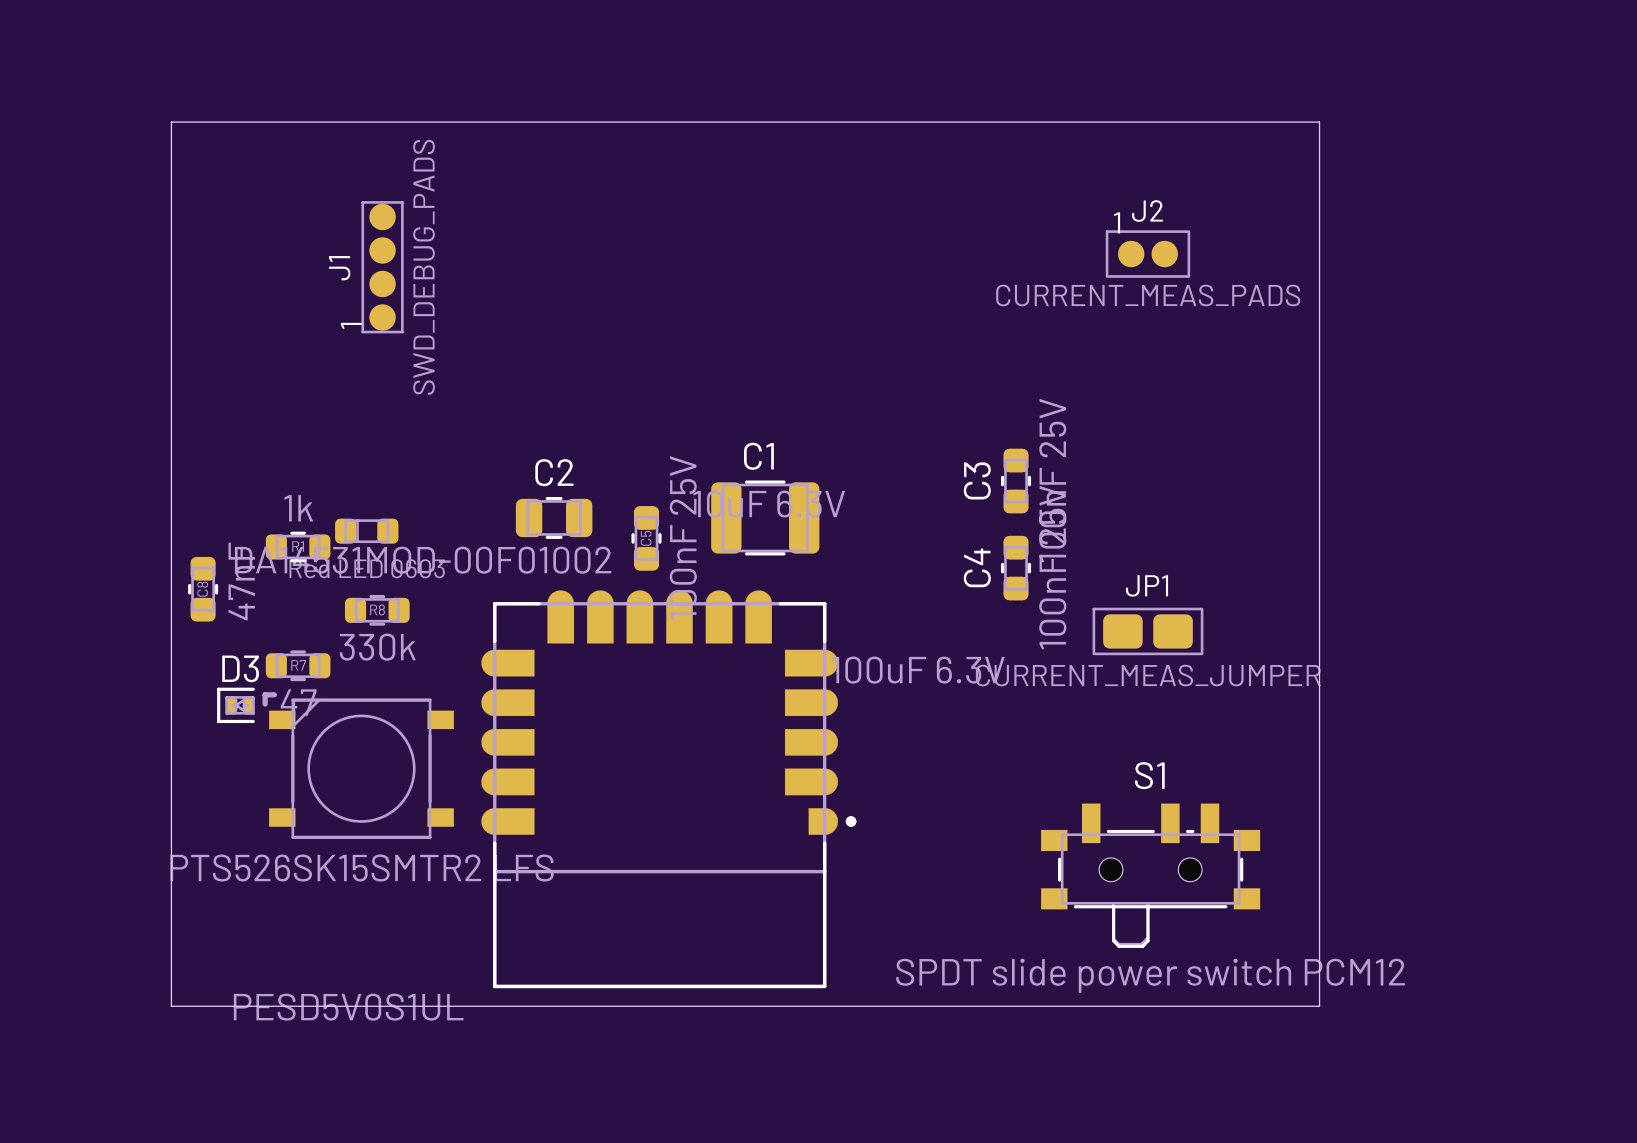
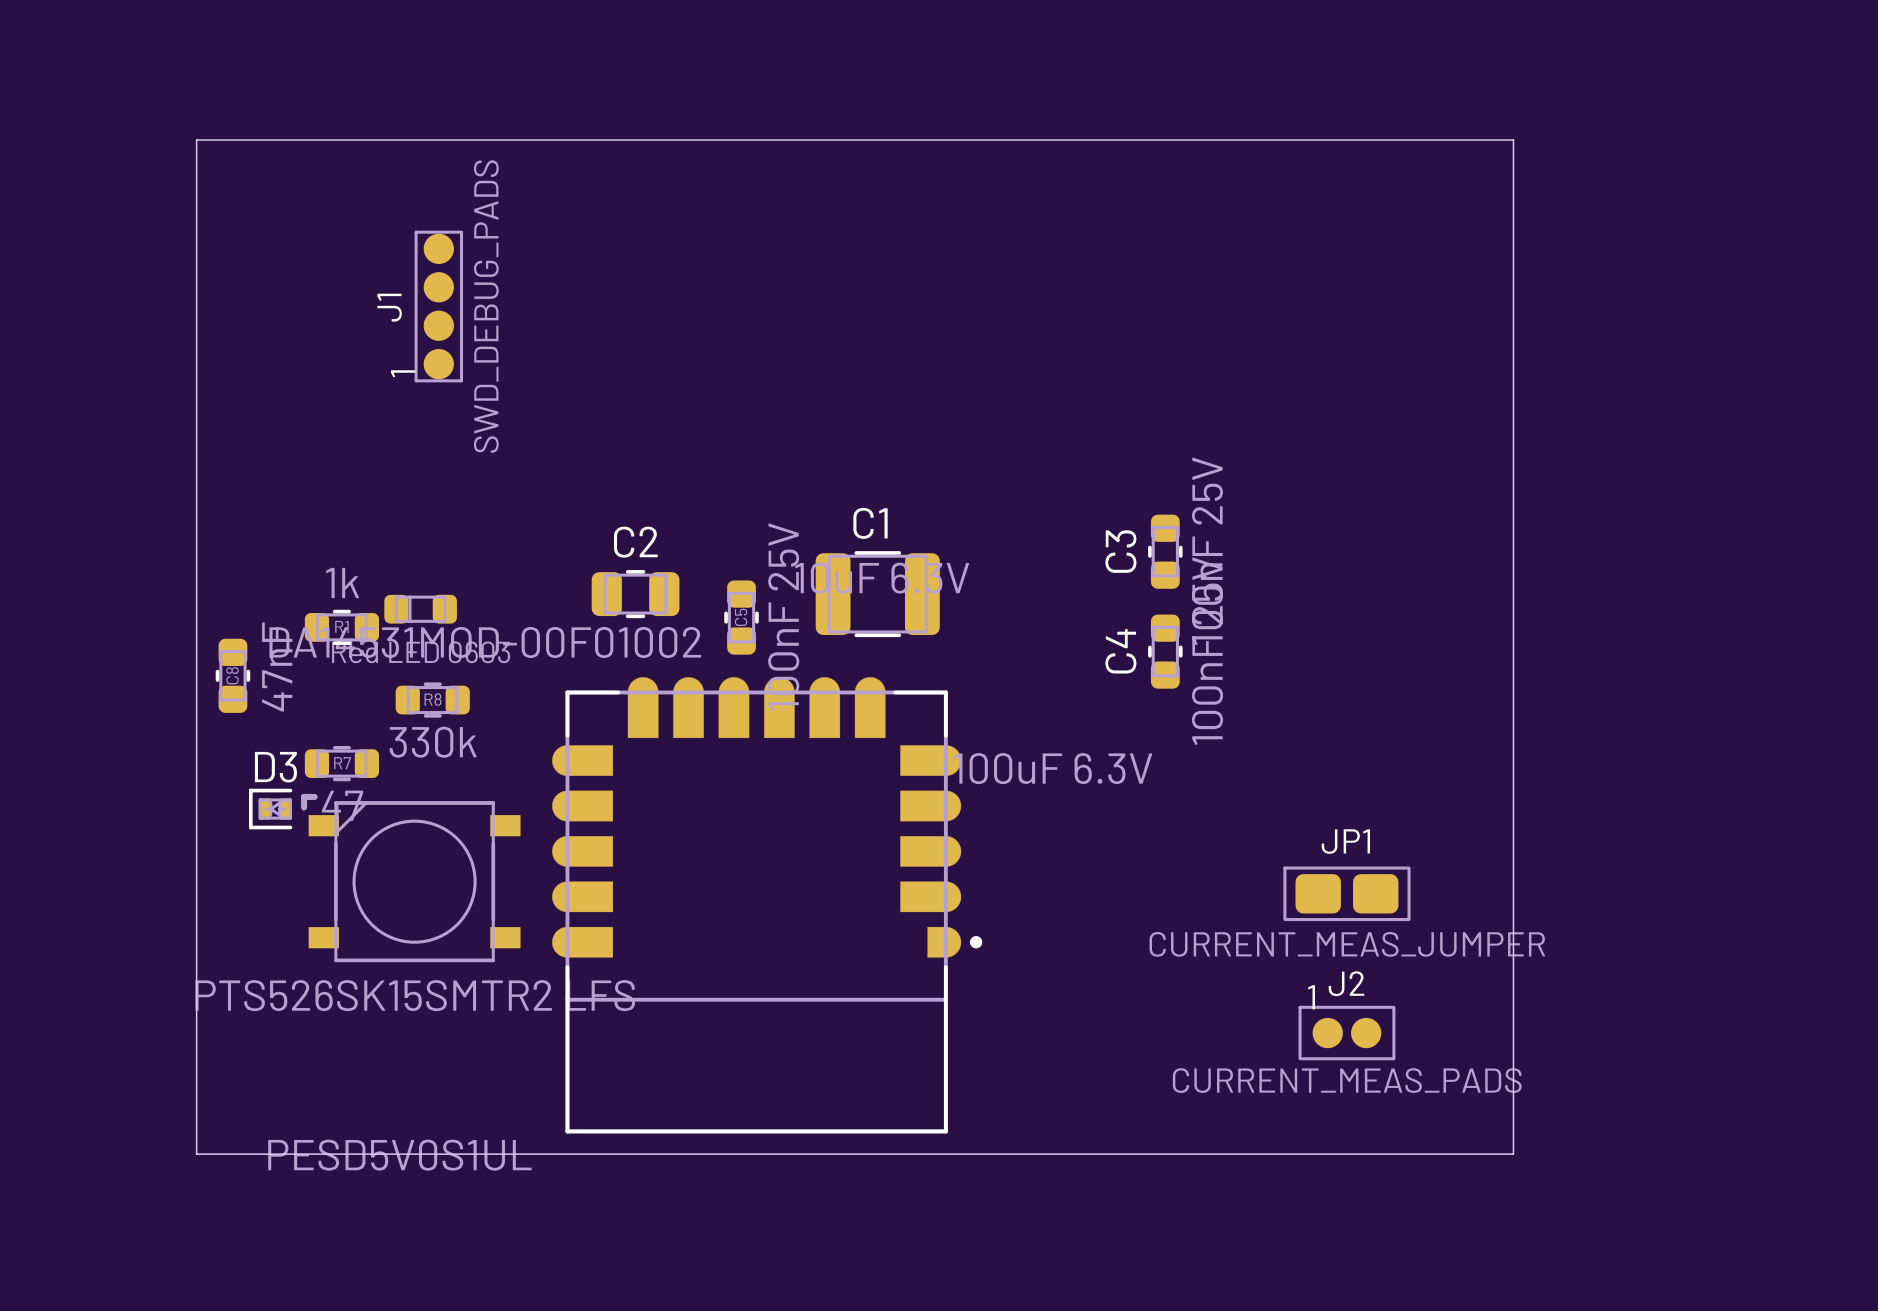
J2 position: (1147, 254) -> (1346, 1033)
JP1 position: (1147, 631) -> (1346, 893)
S1: SPDT slide power switch PCM12 (1150, 875) -> none

